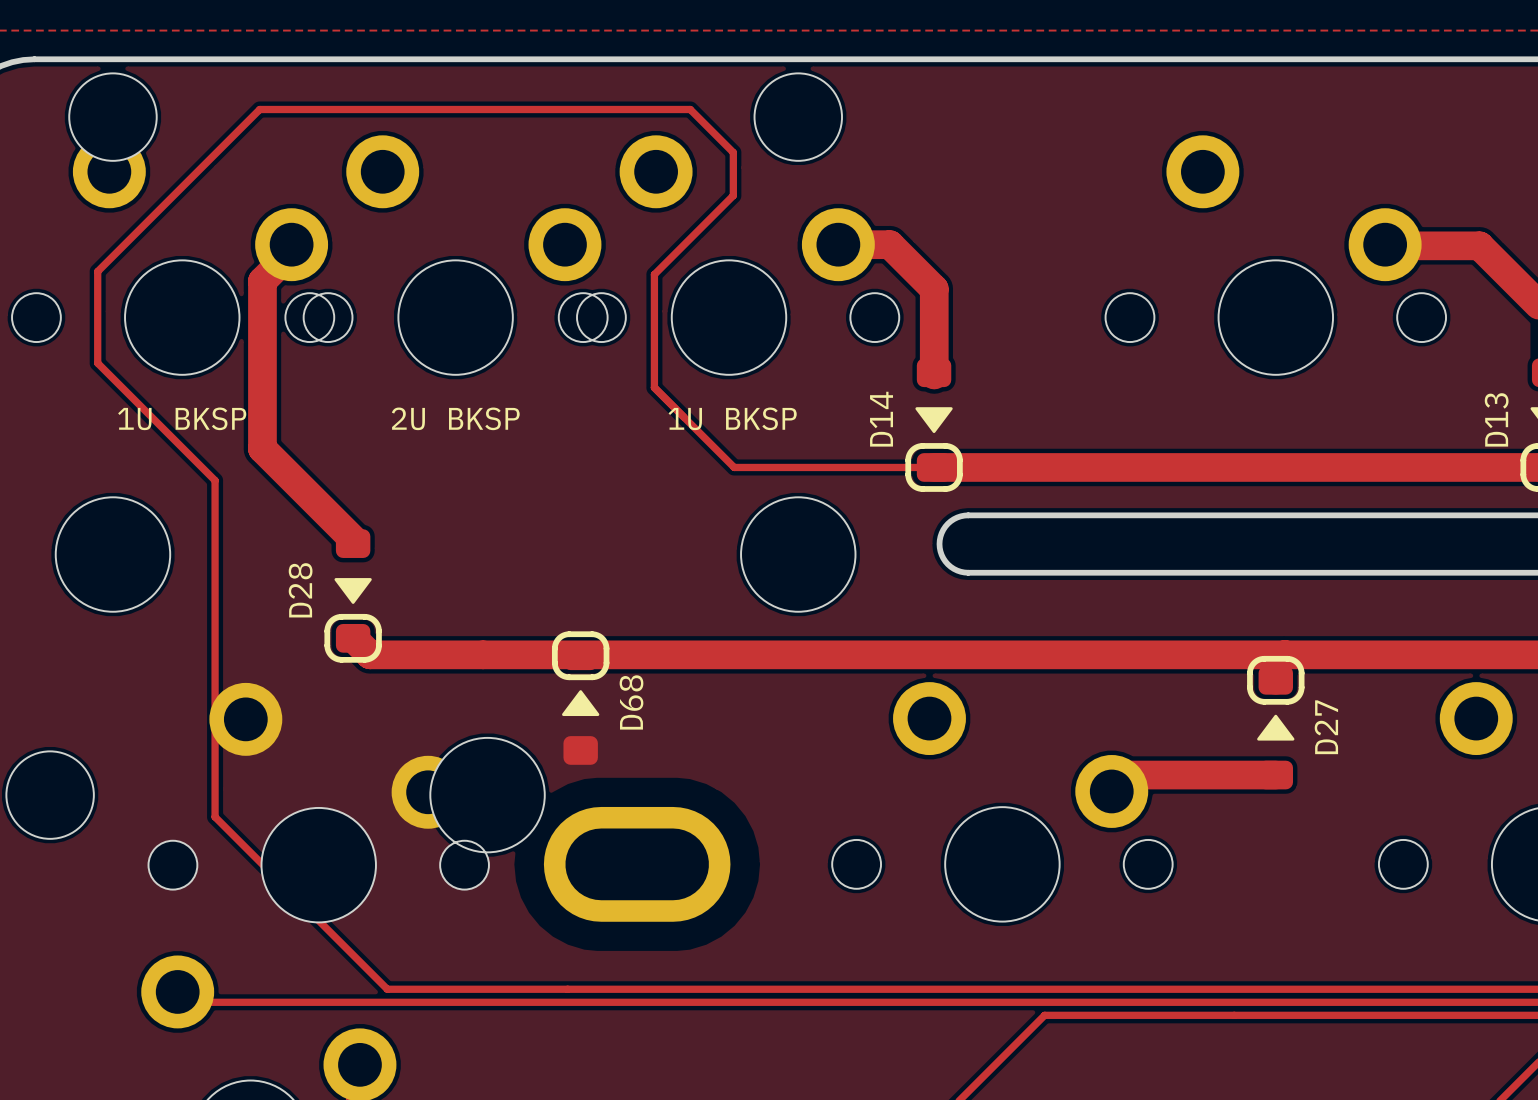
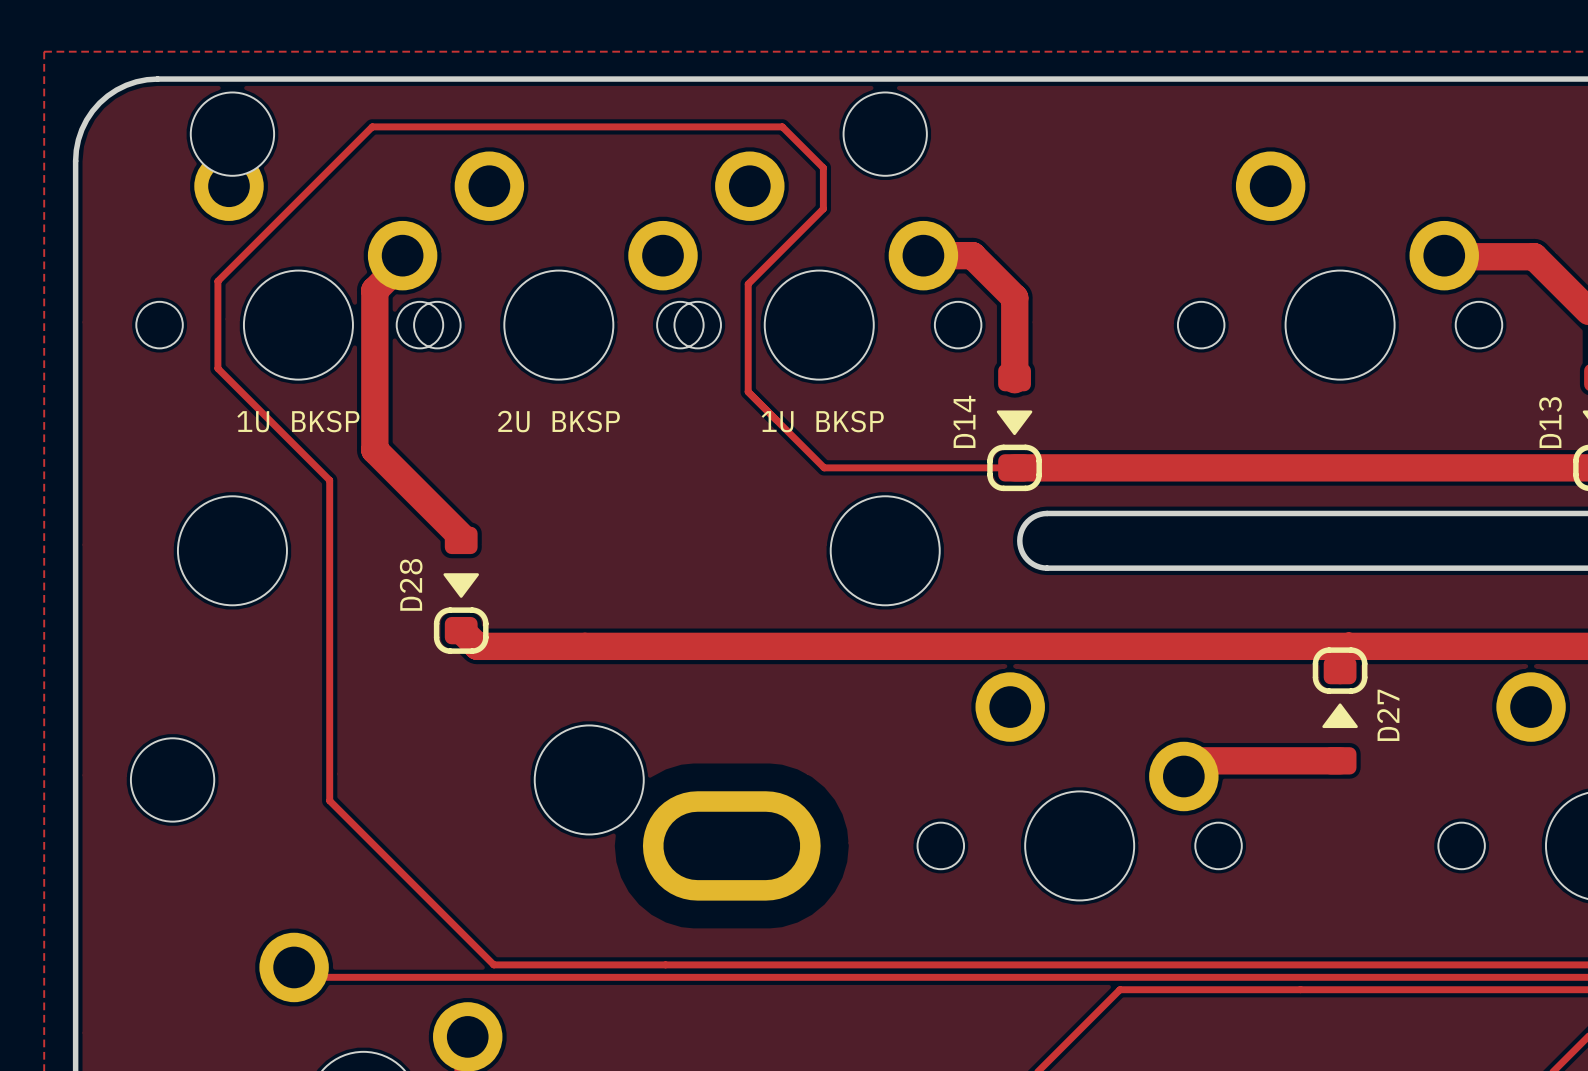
D68: (580, 698) -> none
part: (318, 802) -> none

